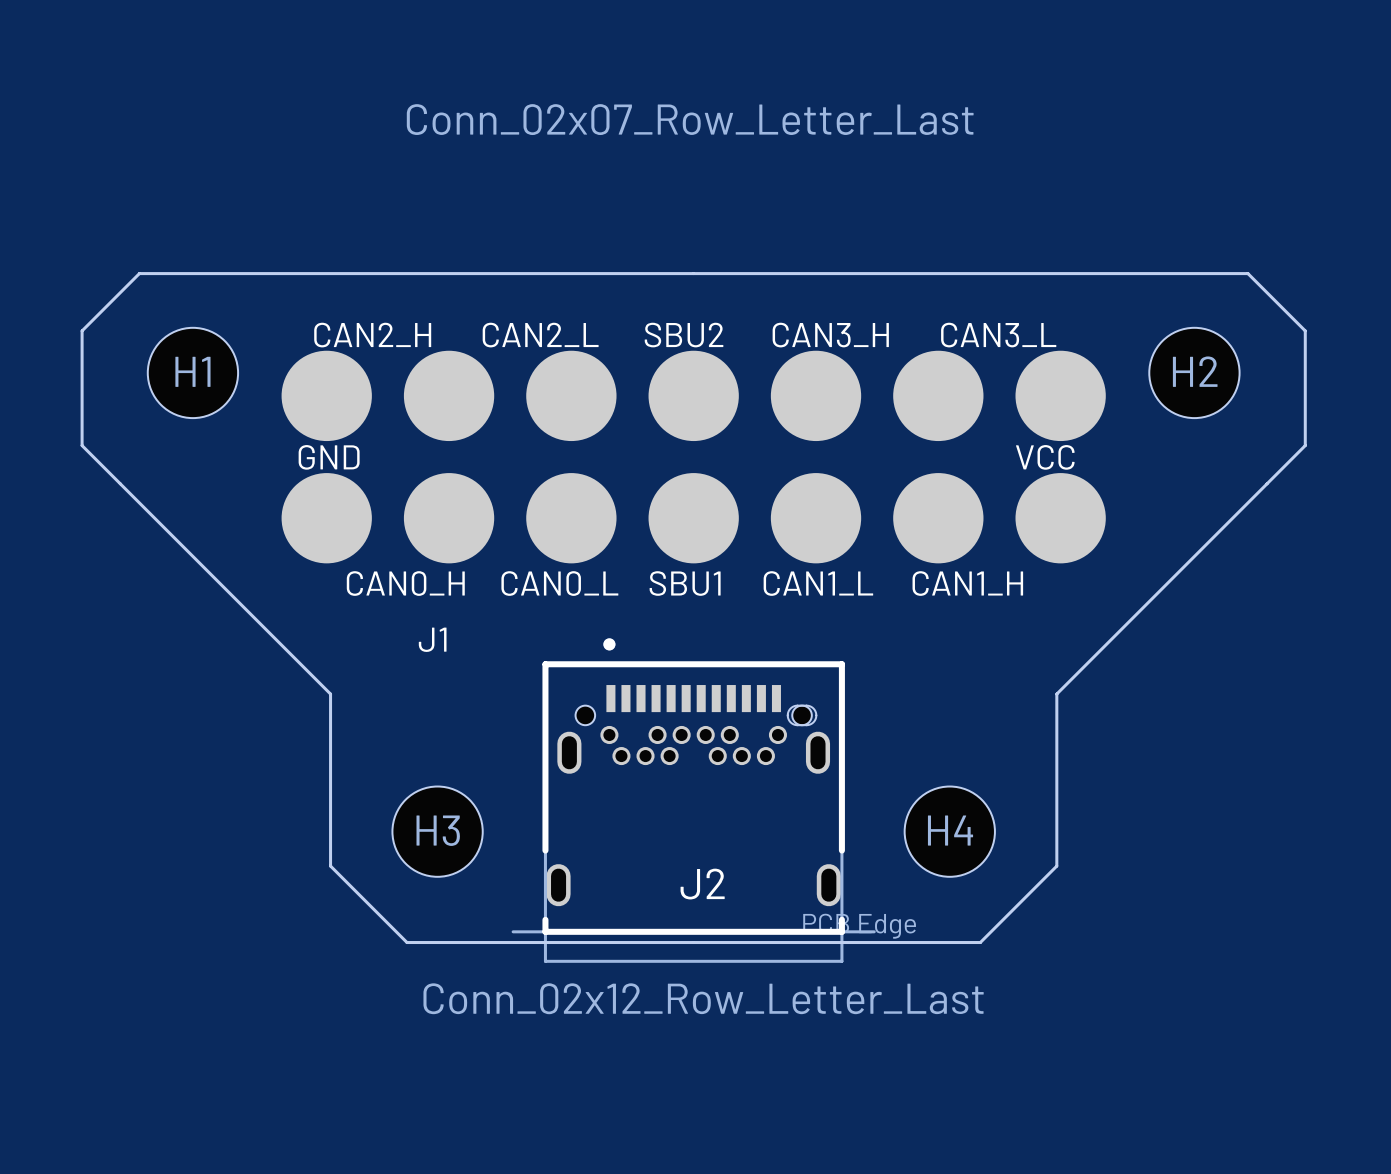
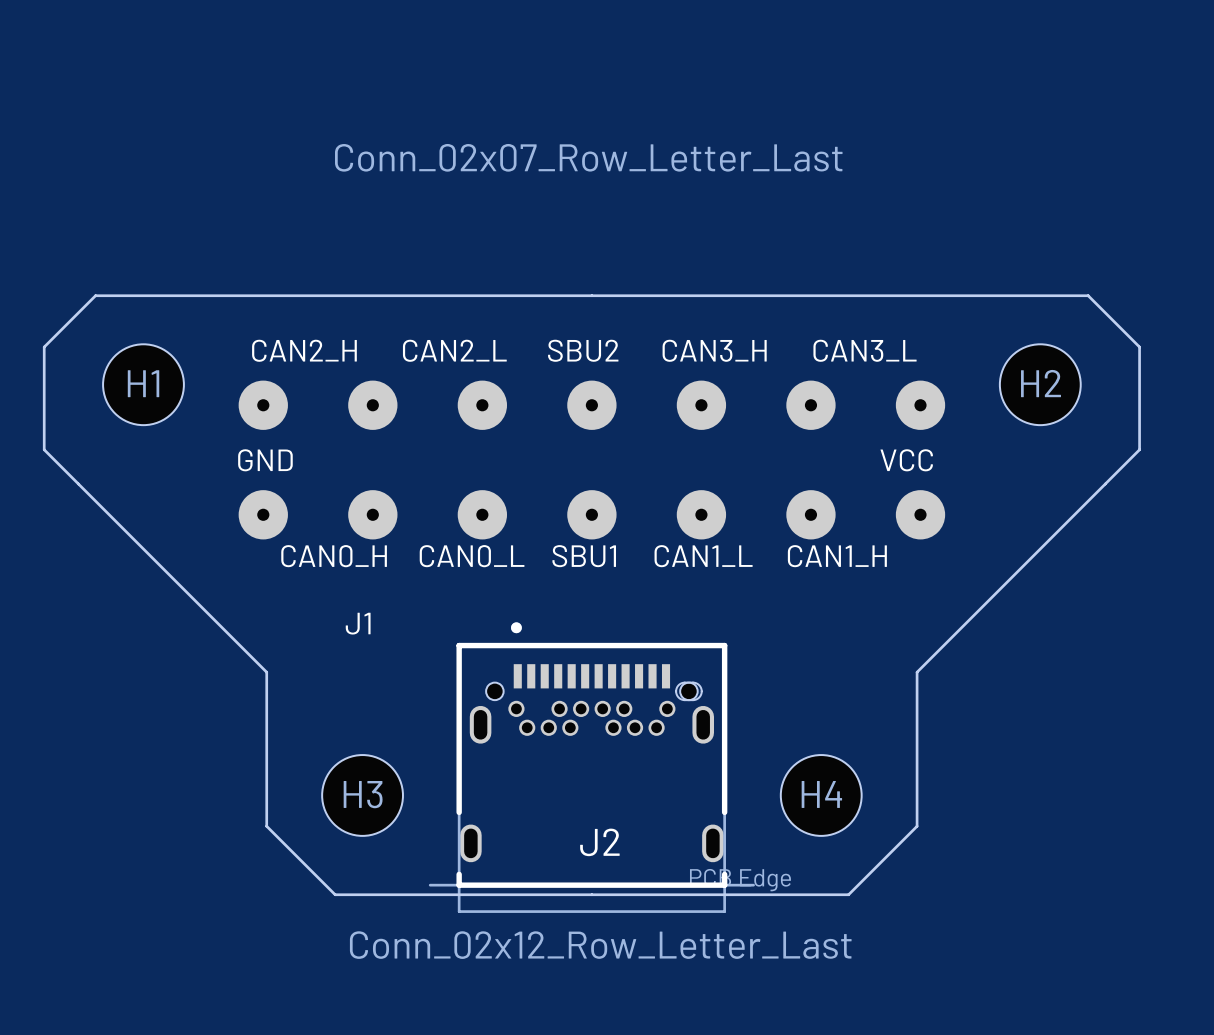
J1 footprint: [281, 350, 1106, 564] -> [238, 380, 946, 540]

